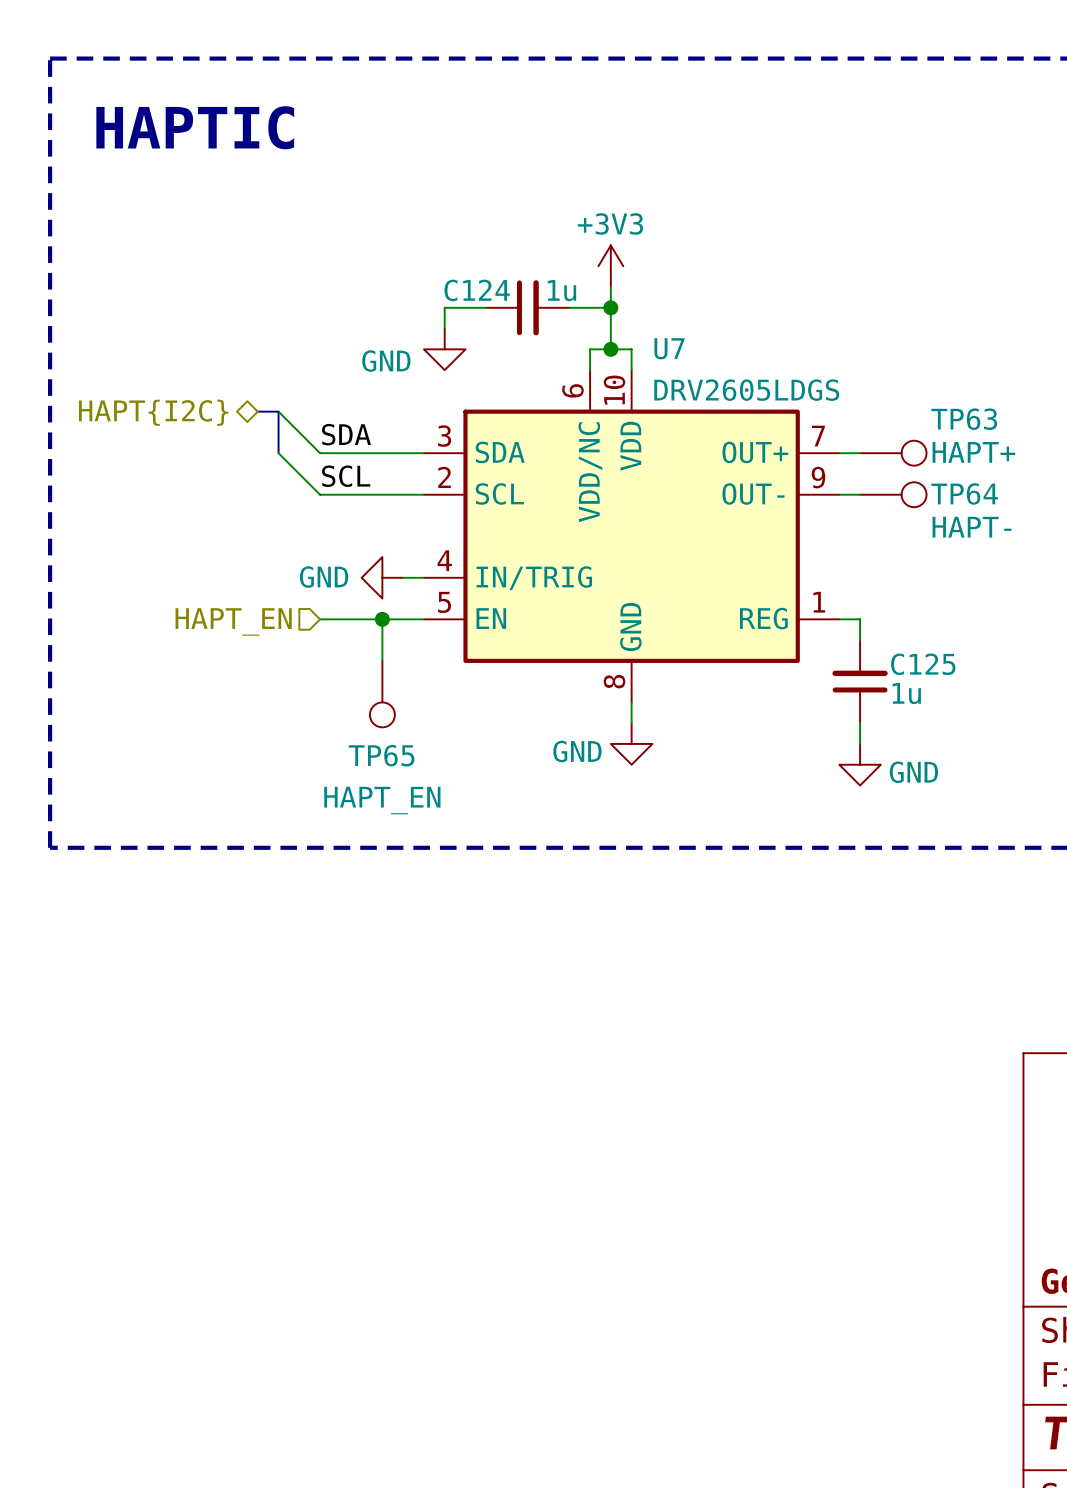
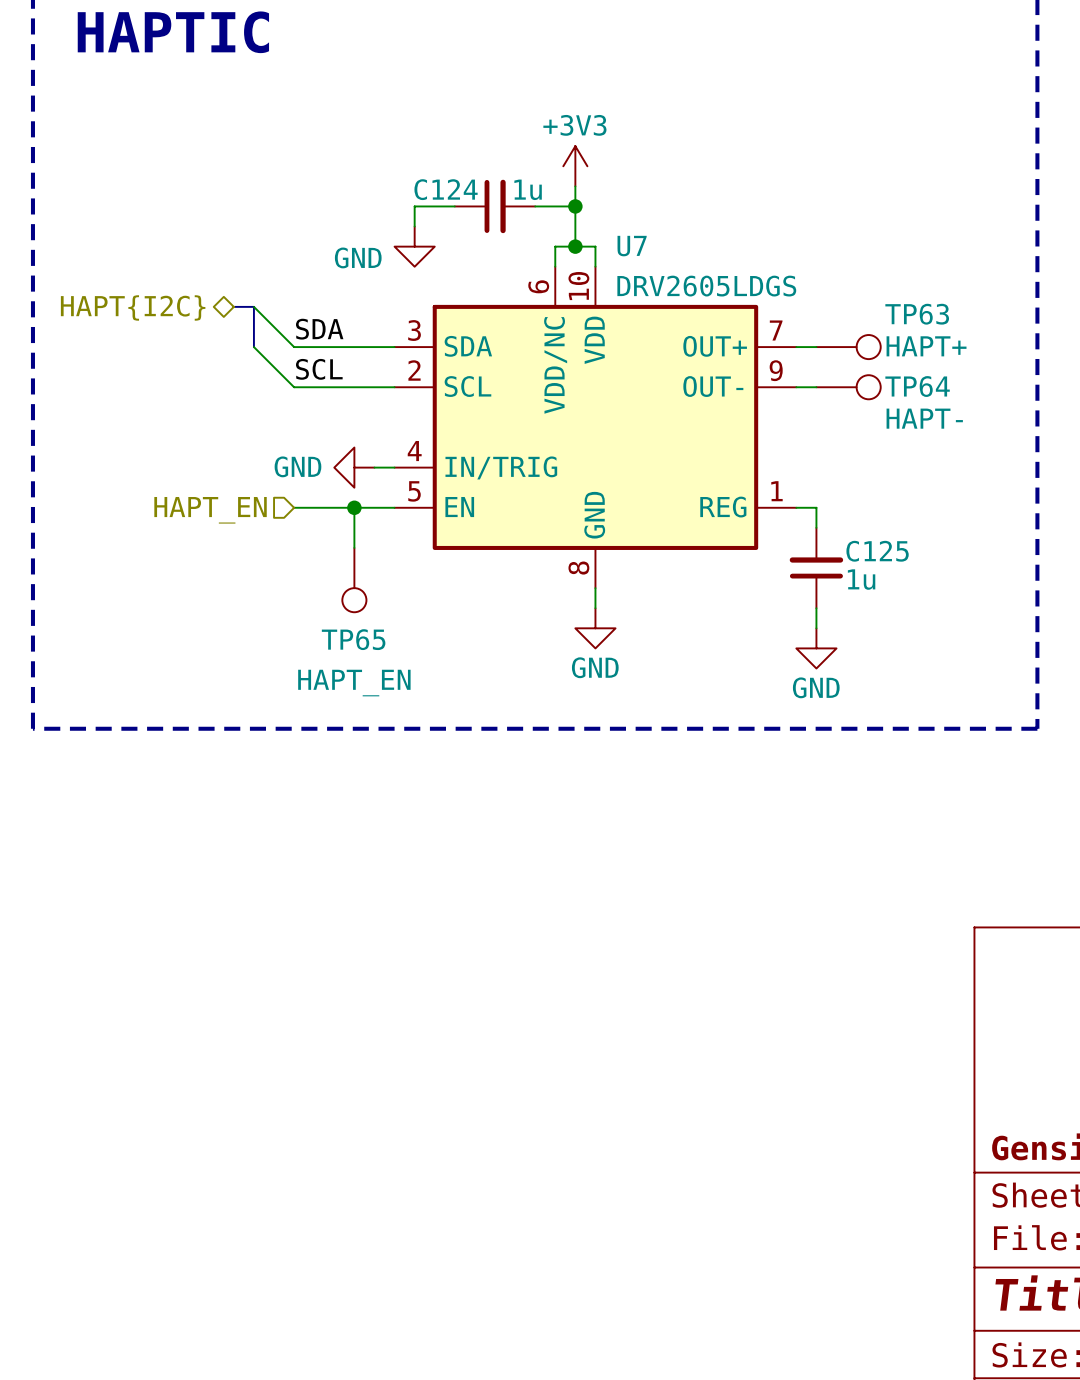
power symbol text position: GND (577, 751) -> GND (595, 667)
power symbol text position: GND (913, 772) -> GND (816, 687)

